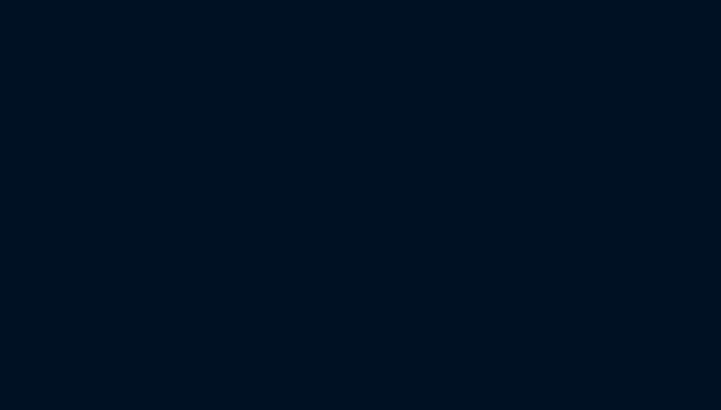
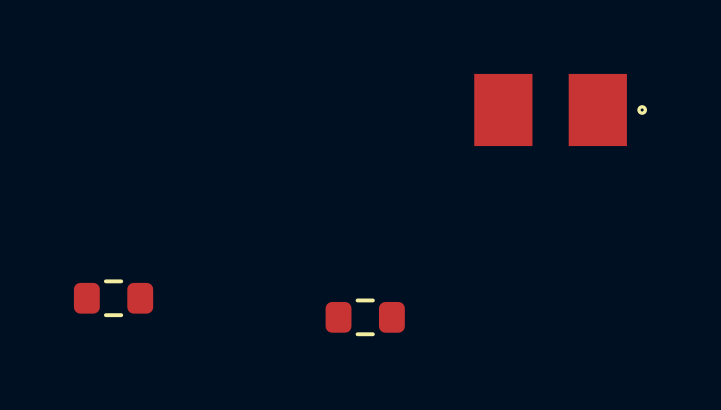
part: none -> (560, 109)
part: none -> (113, 298)
part: none -> (365, 317)

